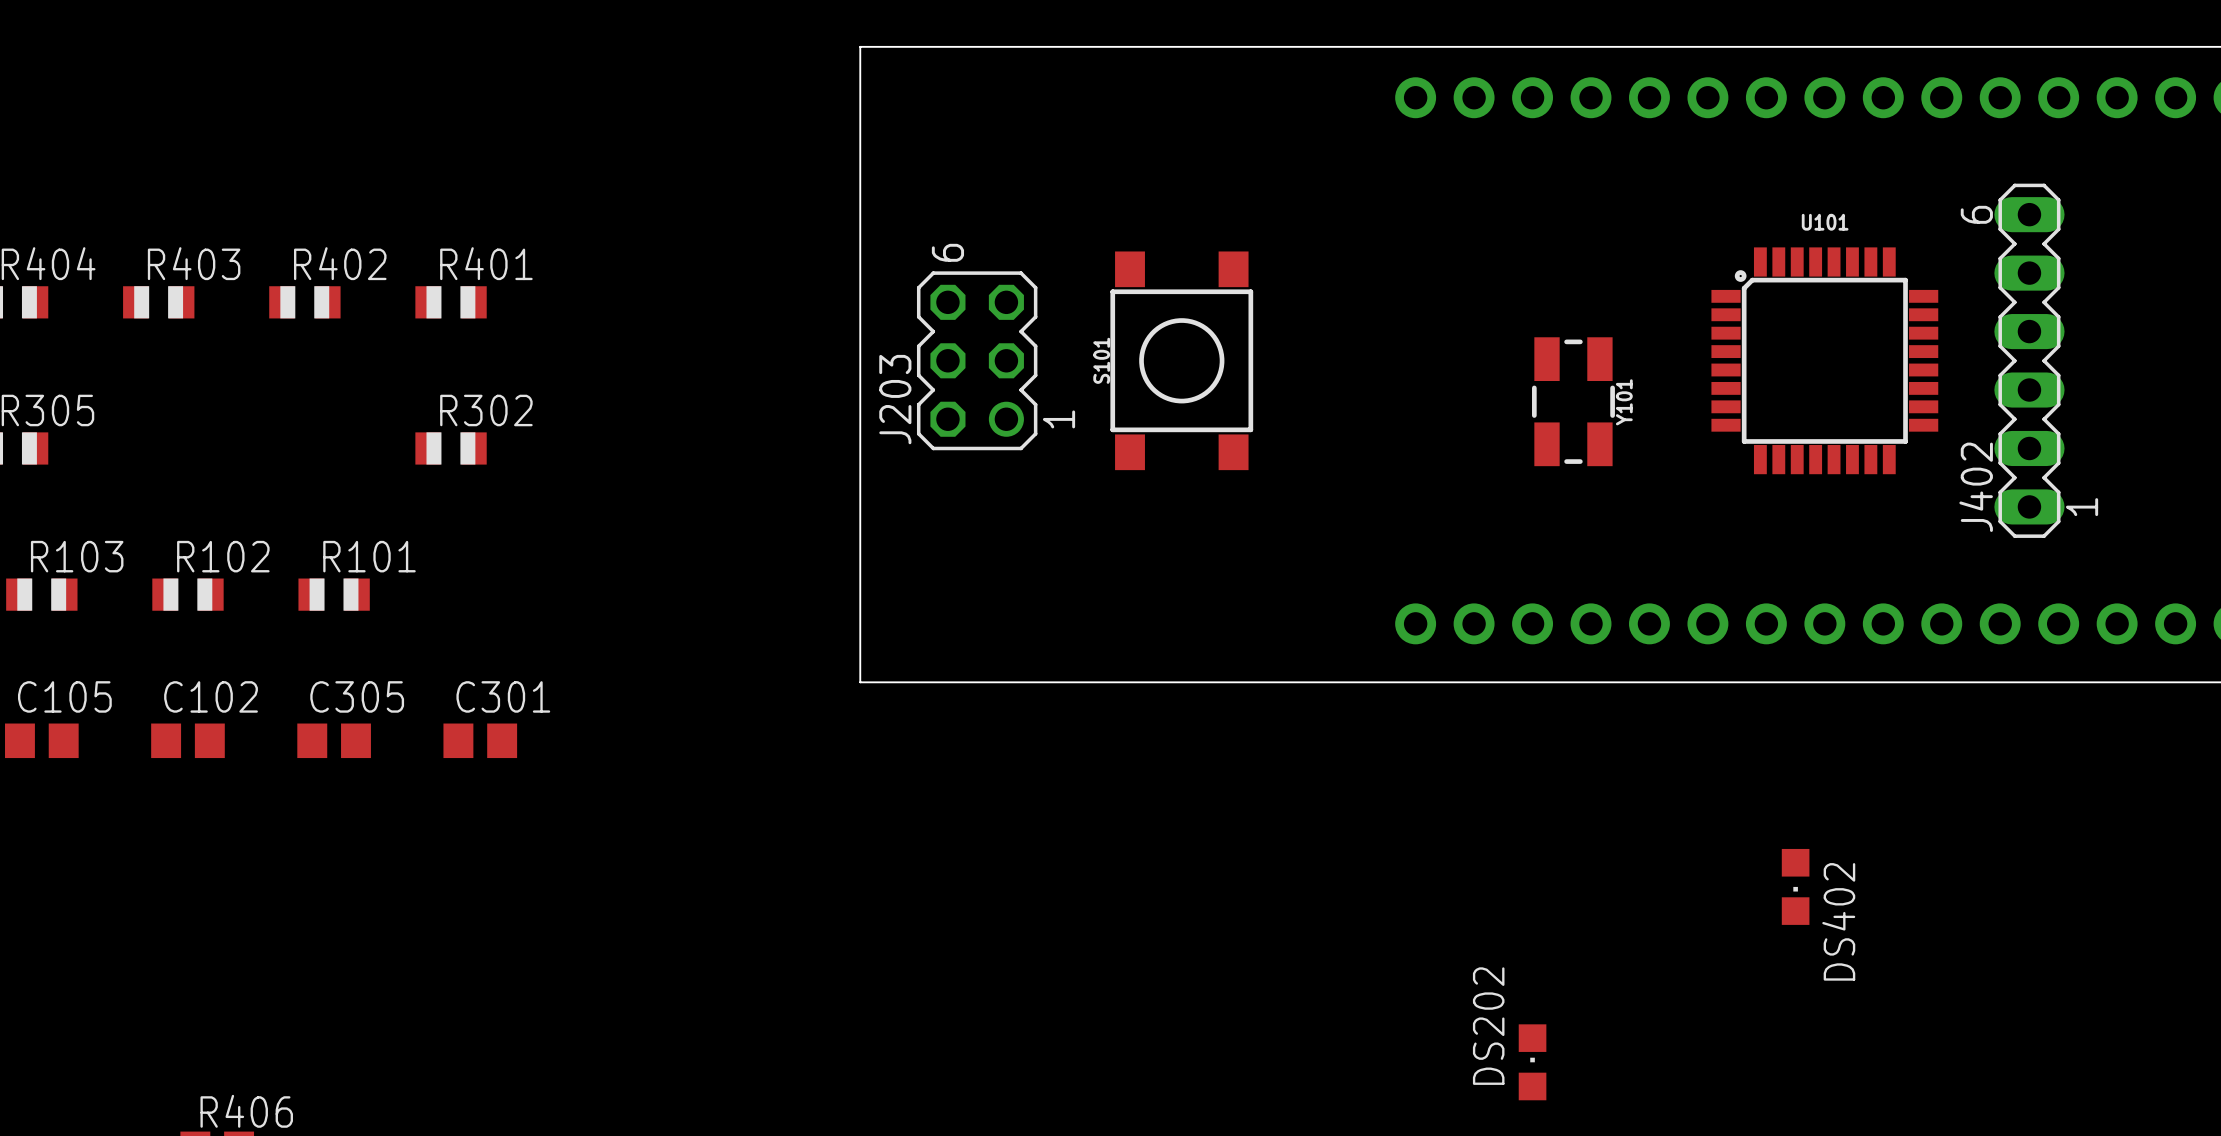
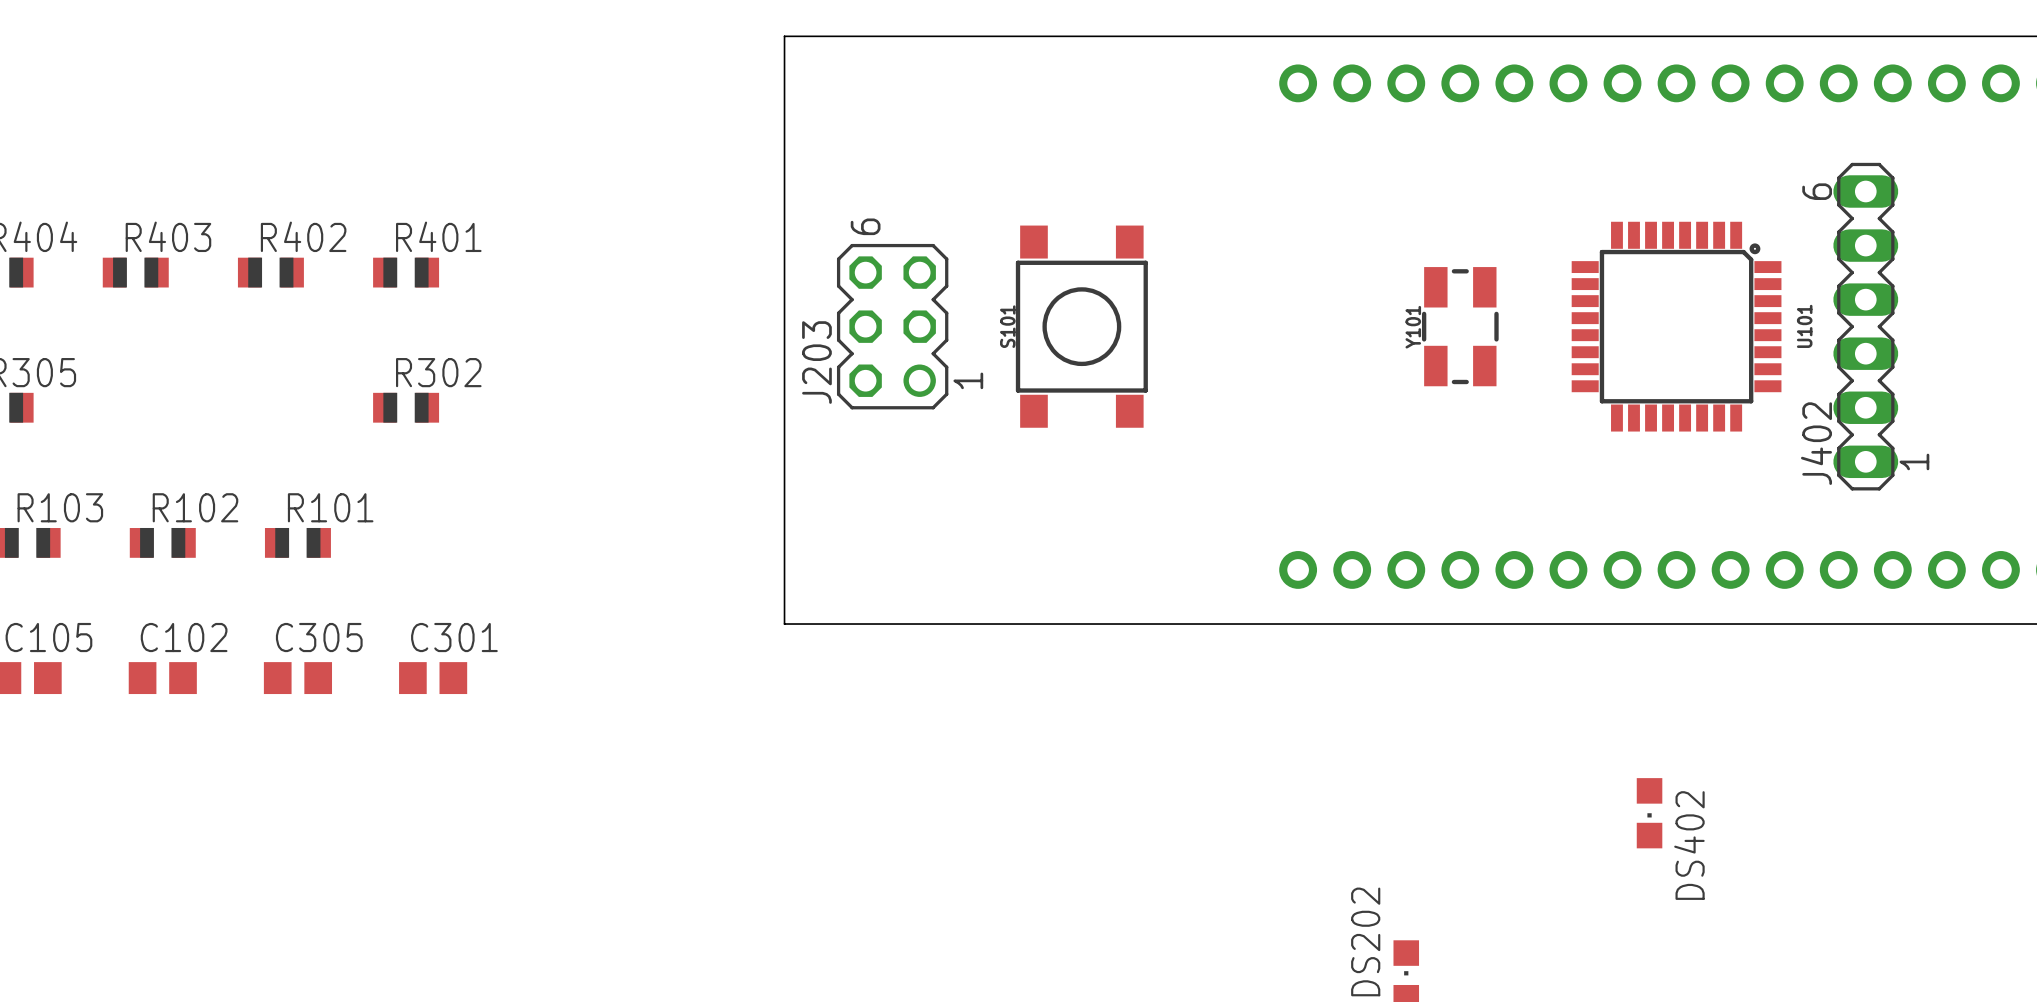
U101 rotation: 0° (1824, 360) -> 90° clockwise (1676, 326)
Y101 position: (1573, 401) -> (1460, 326)
Y101 name position: Y101 (1624, 402) -> Y101 (1413, 327)

